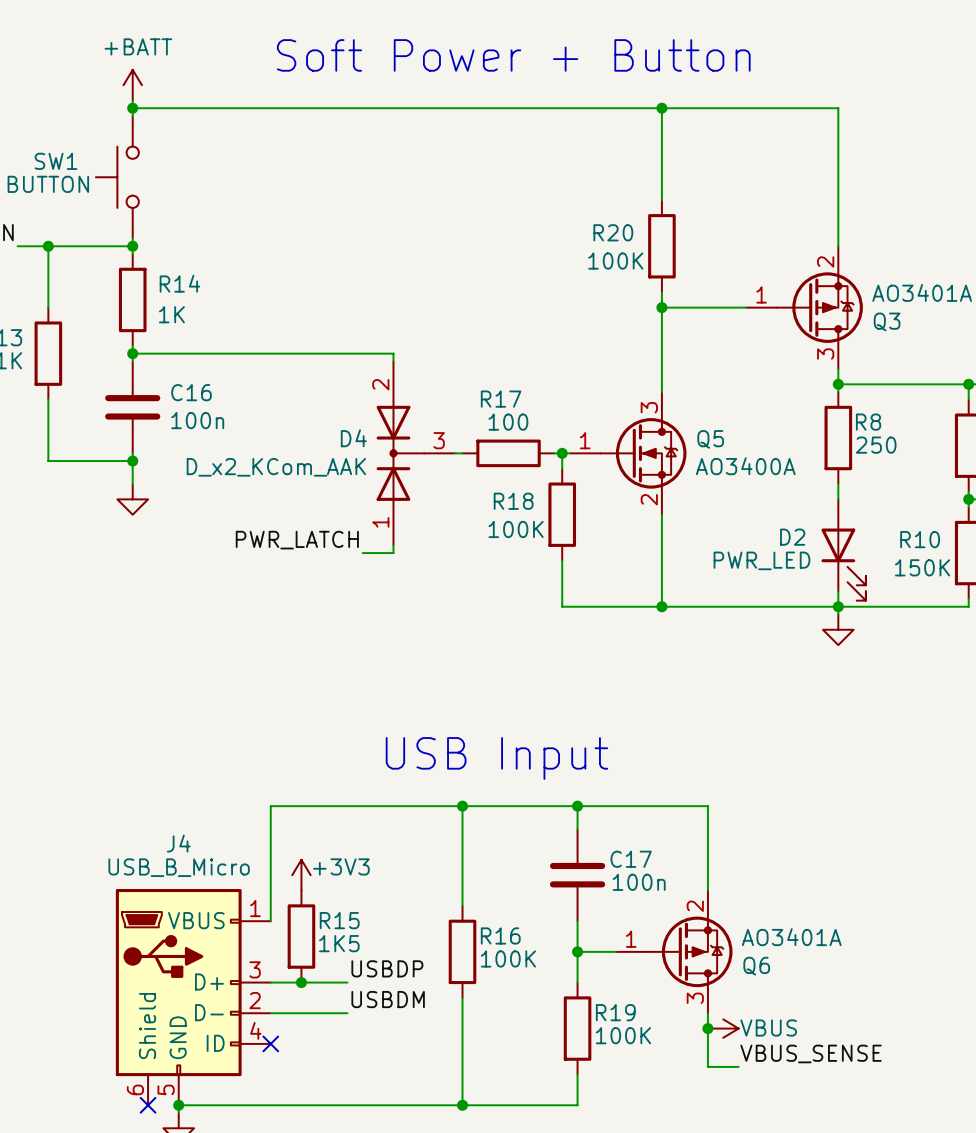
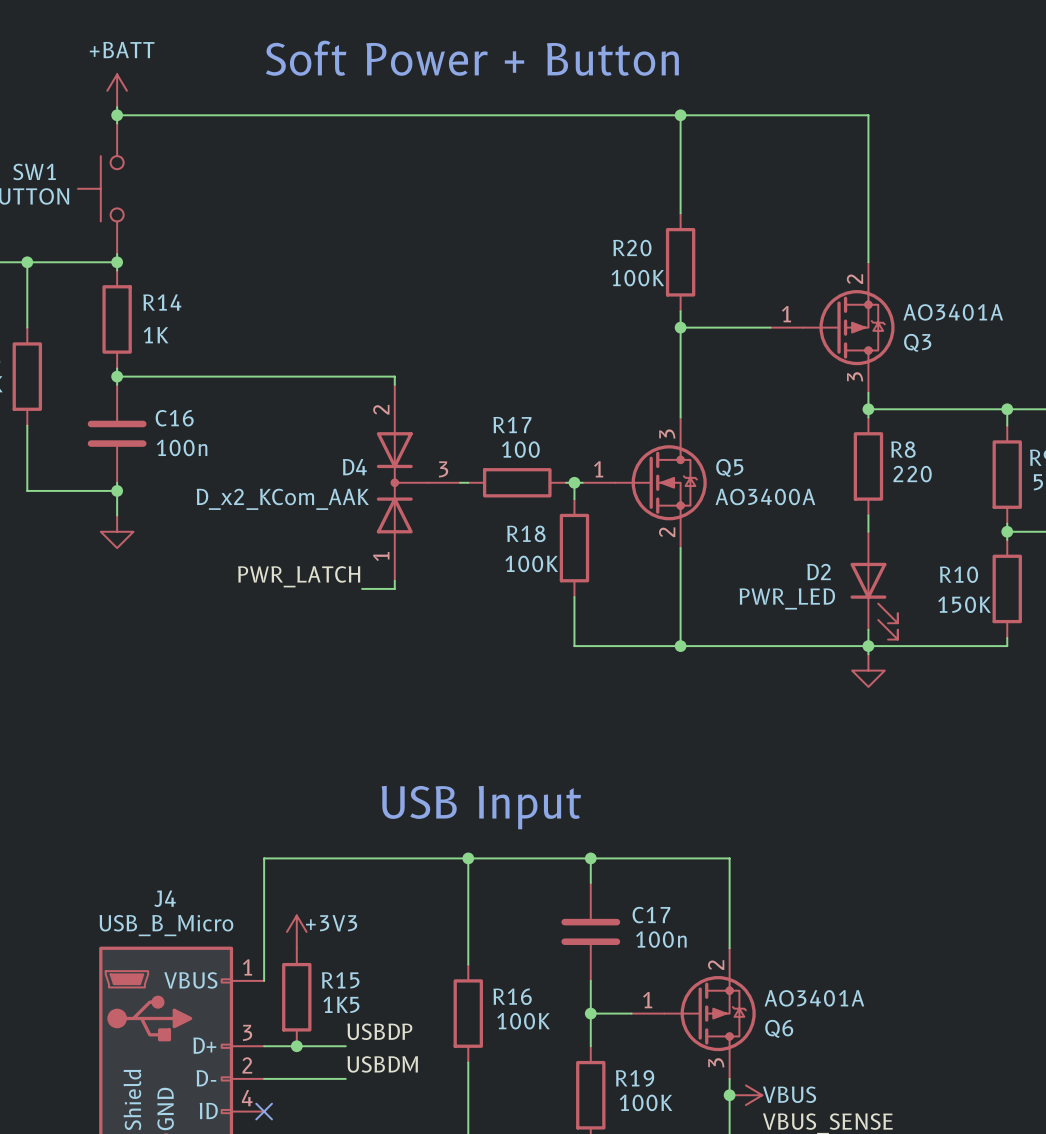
R8 value: 250 (876, 445) -> 220 (912, 474)

